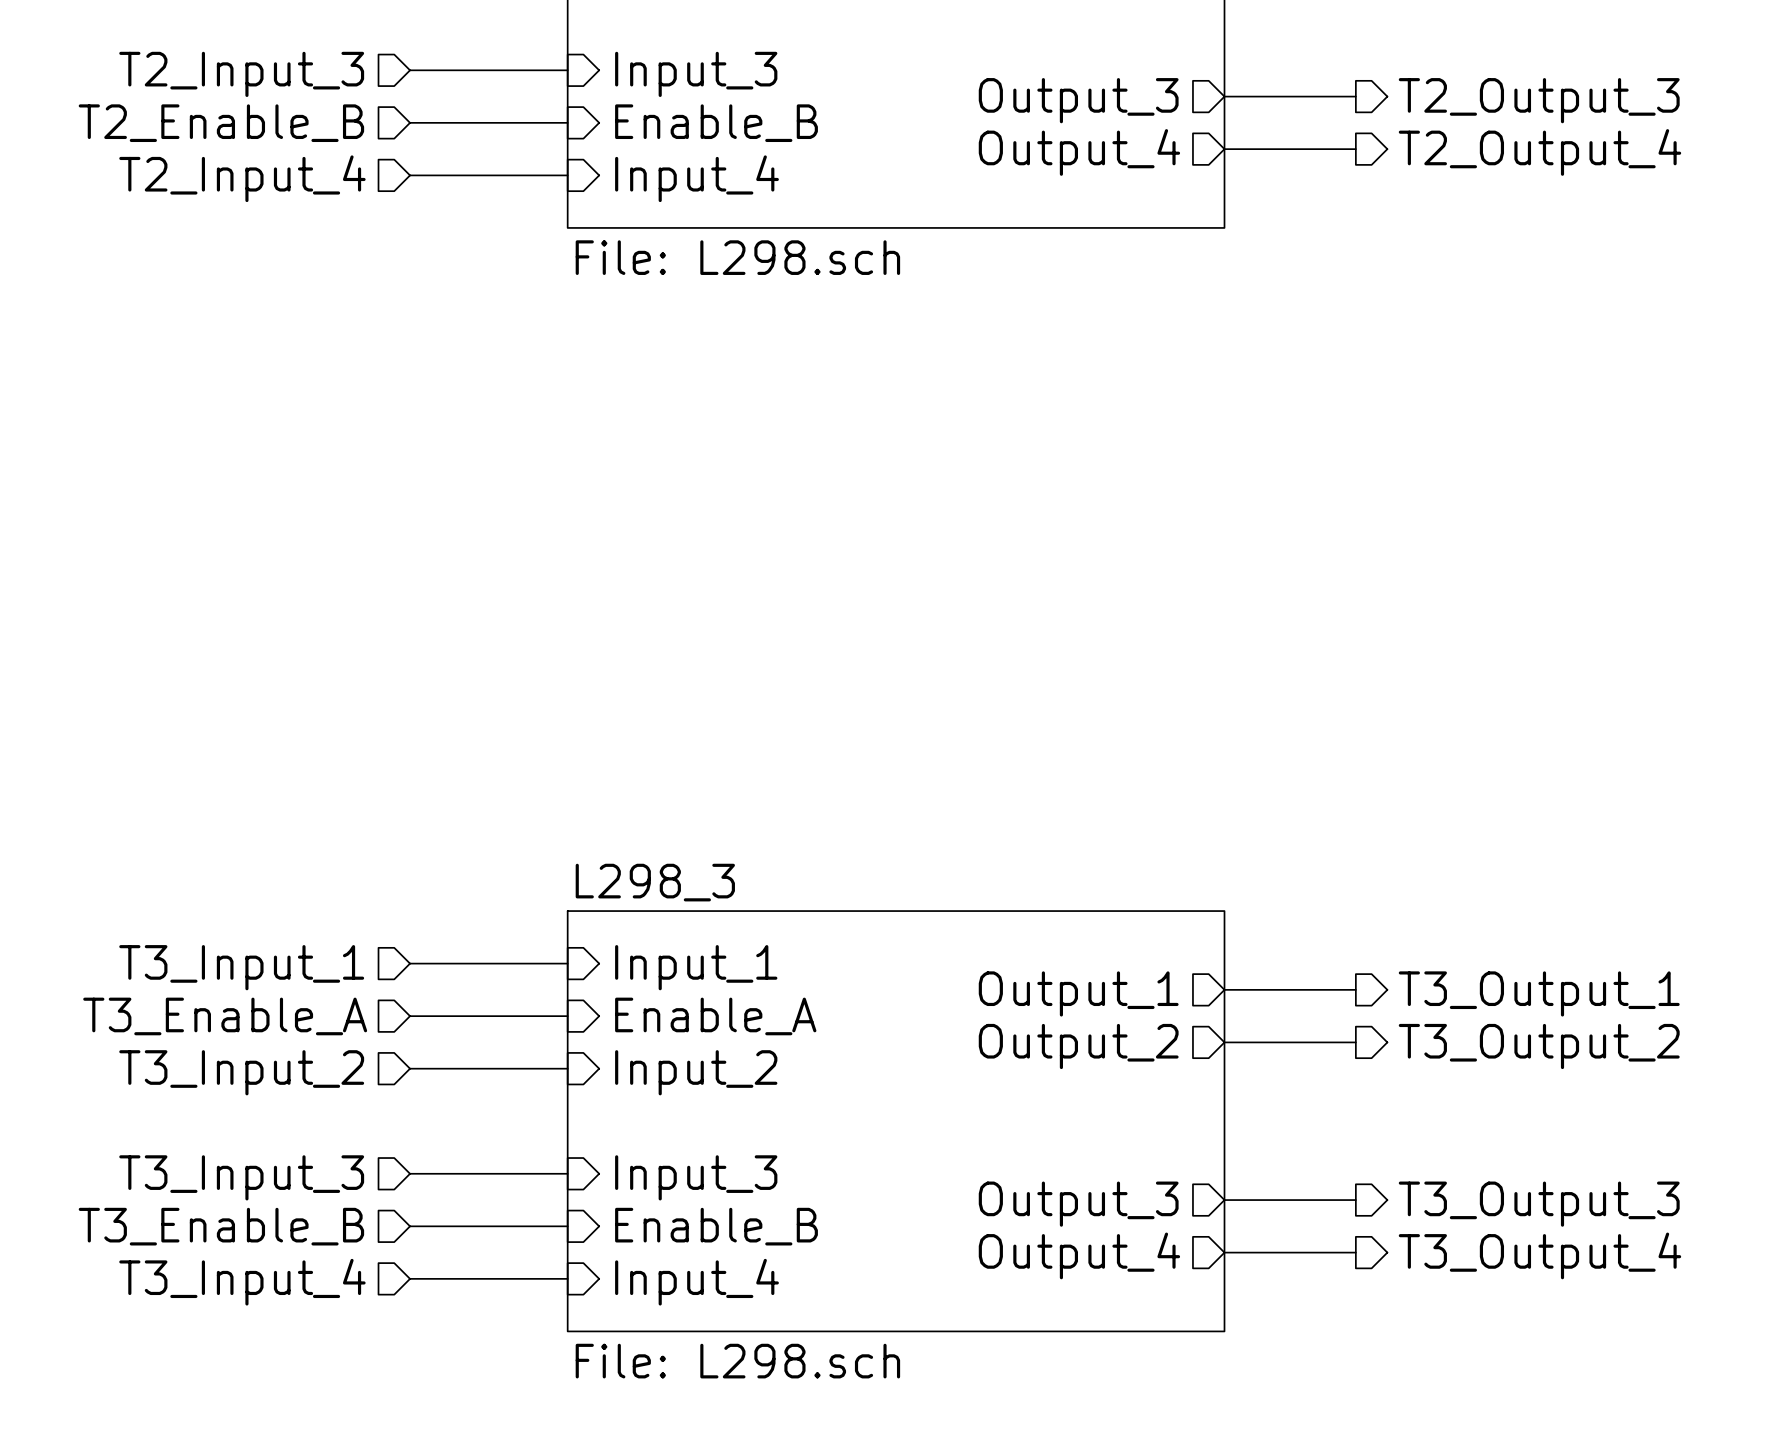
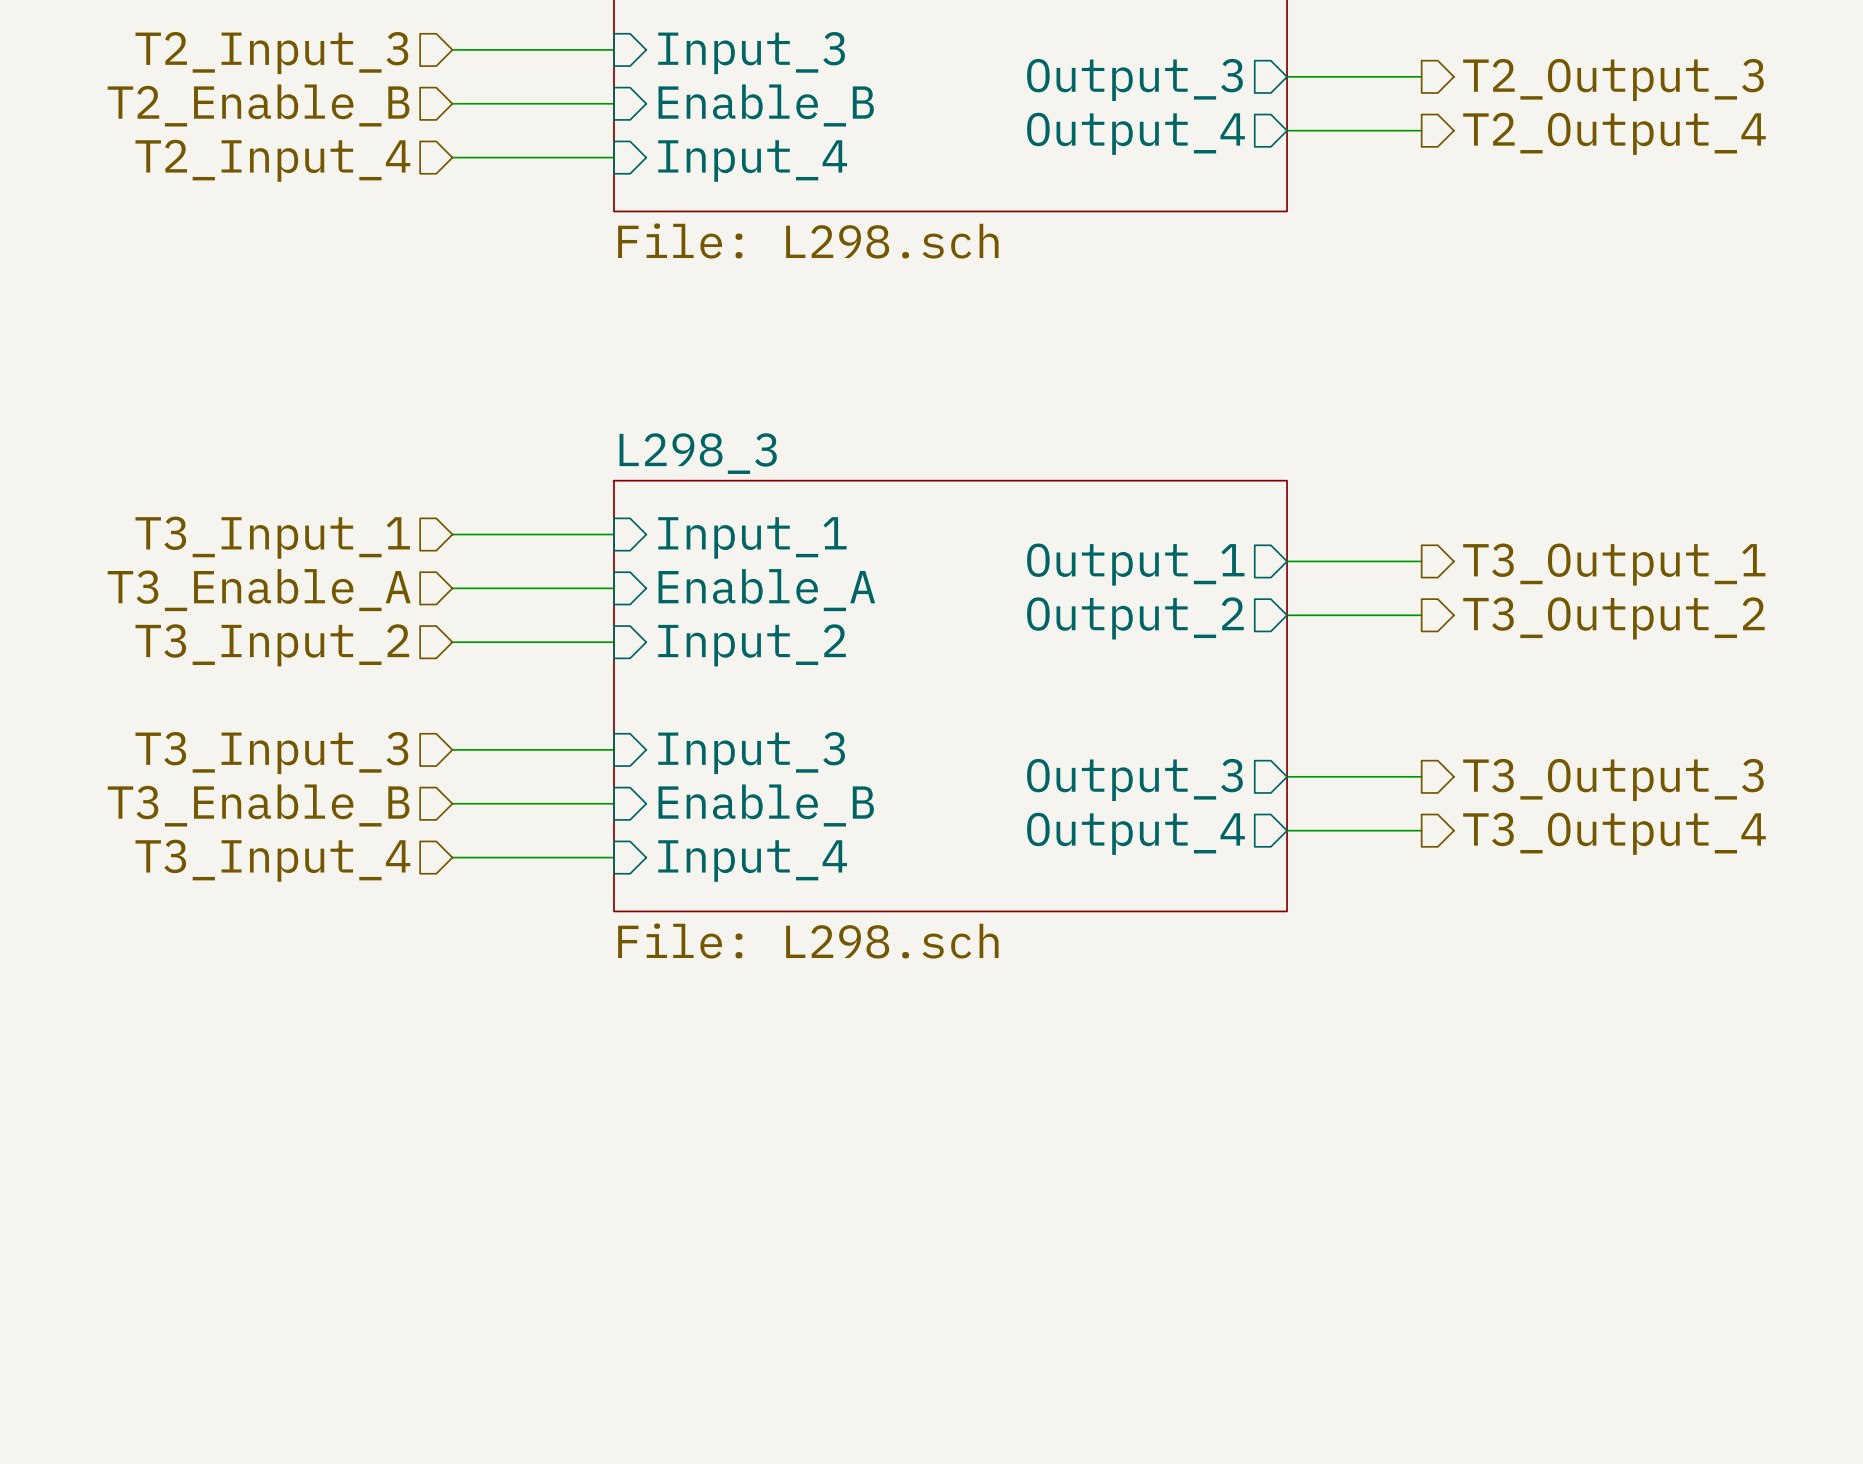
wire: (410, 963) (567, 963) -> (452, 534) (613, 534)
hierarchical label position: T3_Input_1 (241, 967) -> T3_Input_1 (272, 537)
sheet pin position: Input_1 (696, 967) -> Input_1 (752, 537)
wire: (1224, 989) (1355, 989) -> (1287, 561) (1421, 561)
sheet pin position: Output_1 (1078, 993) -> Output_1 (1135, 564)
hierarchical label position: T3_Output_1 (1539, 993) -> T3_Output_1 (1614, 564)
hierarchical label position: T3_Enable_A (225, 1016) -> T3_Enable_A (259, 590)
wire: (410, 1016) (567, 1016) -> (452, 588) (613, 588)
sheet pin position: Enable_A (715, 1016) -> Enable_A (766, 590)
wire: (1224, 1042) (1355, 1042) -> (1287, 615) (1421, 615)
sheet pin position: Output_2 (1078, 1046) -> Output_2 (1135, 618)
hierarchical label position: T3_Output_2 (1539, 1046) -> T3_Output_2 (1613, 618)
wire: (410, 1068) (567, 1068) -> (452, 642) (613, 642)
hierarchical label position: T3_Input_2 (241, 1072) -> T3_Input_2 (272, 645)
sheet pin position: Input_2 (696, 1072) -> Input_2 (752, 645)
sheet L298_3 position: (896, 1121) -> (950, 696)
wire: (410, 1173) (567, 1173) -> (452, 749) (613, 749)
hierarchical label position: T3_Input_3 (241, 1177) -> T3_Input_3 (271, 753)
sheet pin position: Input_3 (696, 1177) -> Input_3 (751, 753)
wire: (1224, 1200) (1355, 1200) -> (1287, 776) (1421, 776)
sheet pin position: Output_3 (1078, 1204) -> Output_3 (1134, 779)
hierarchical label position: T3_Output_3 (1539, 1204) -> T3_Output_3 (1613, 779)
hierarchical label position: T3_Enable_B (221, 1226) -> T3_Enable_B (258, 805)
wire: (410, 1226) (567, 1226) -> (452, 803) (613, 803)
sheet pin position: Enable_B (716, 1226) -> Enable_B (766, 805)
wire: (1224, 1252) (1355, 1252) -> (1287, 830) (1421, 830)
sheet pin position: Output_4 (1079, 1255) -> Output_4 (1135, 833)
hierarchical label position: T3_Output_4 (1539, 1255) -> T3_Output_4 (1614, 833)
wire: (410, 1278) (567, 1278) -> (452, 857) (613, 857)
hierarchical label position: T3_Input_4 (242, 1282) -> T3_Input_4 (272, 860)
sheet pin position: Input_4 (696, 1282) -> Input_4 (752, 861)

